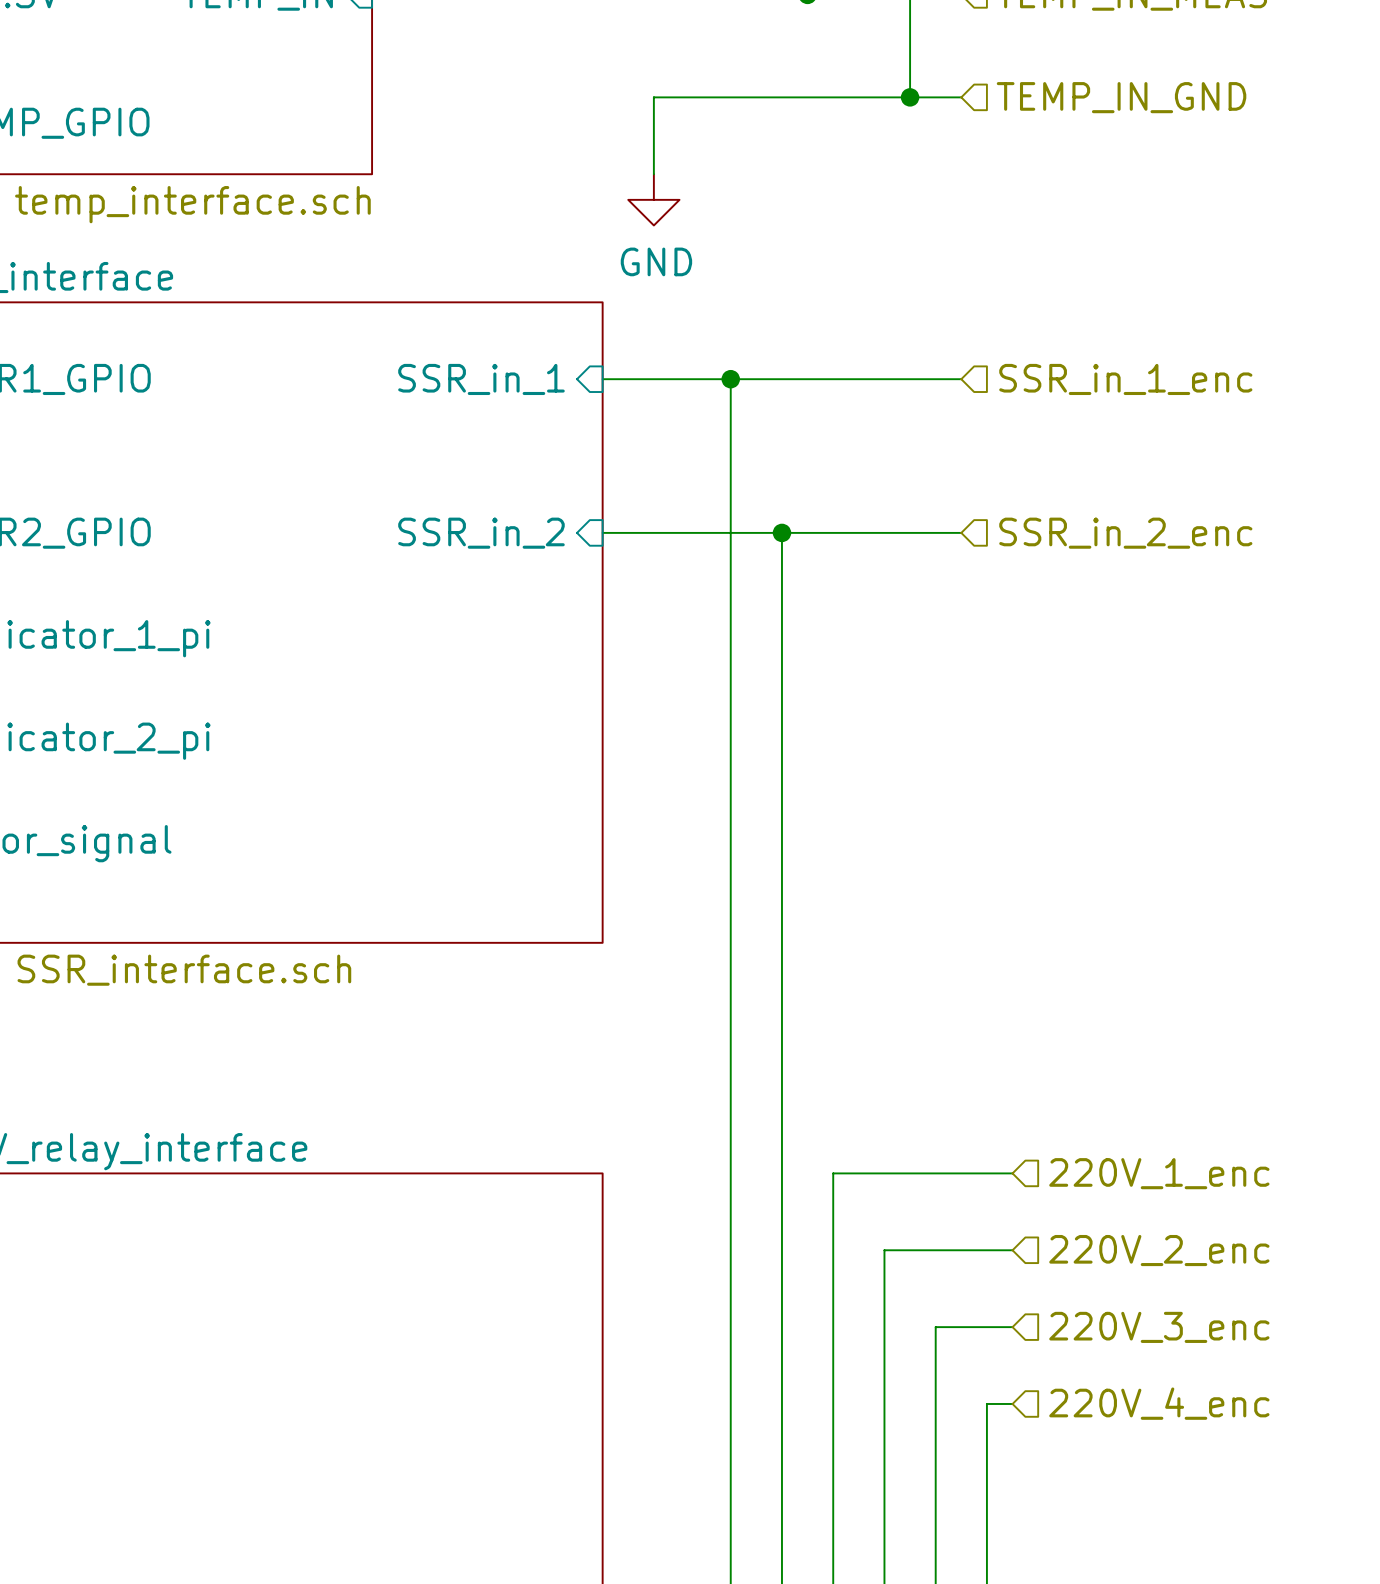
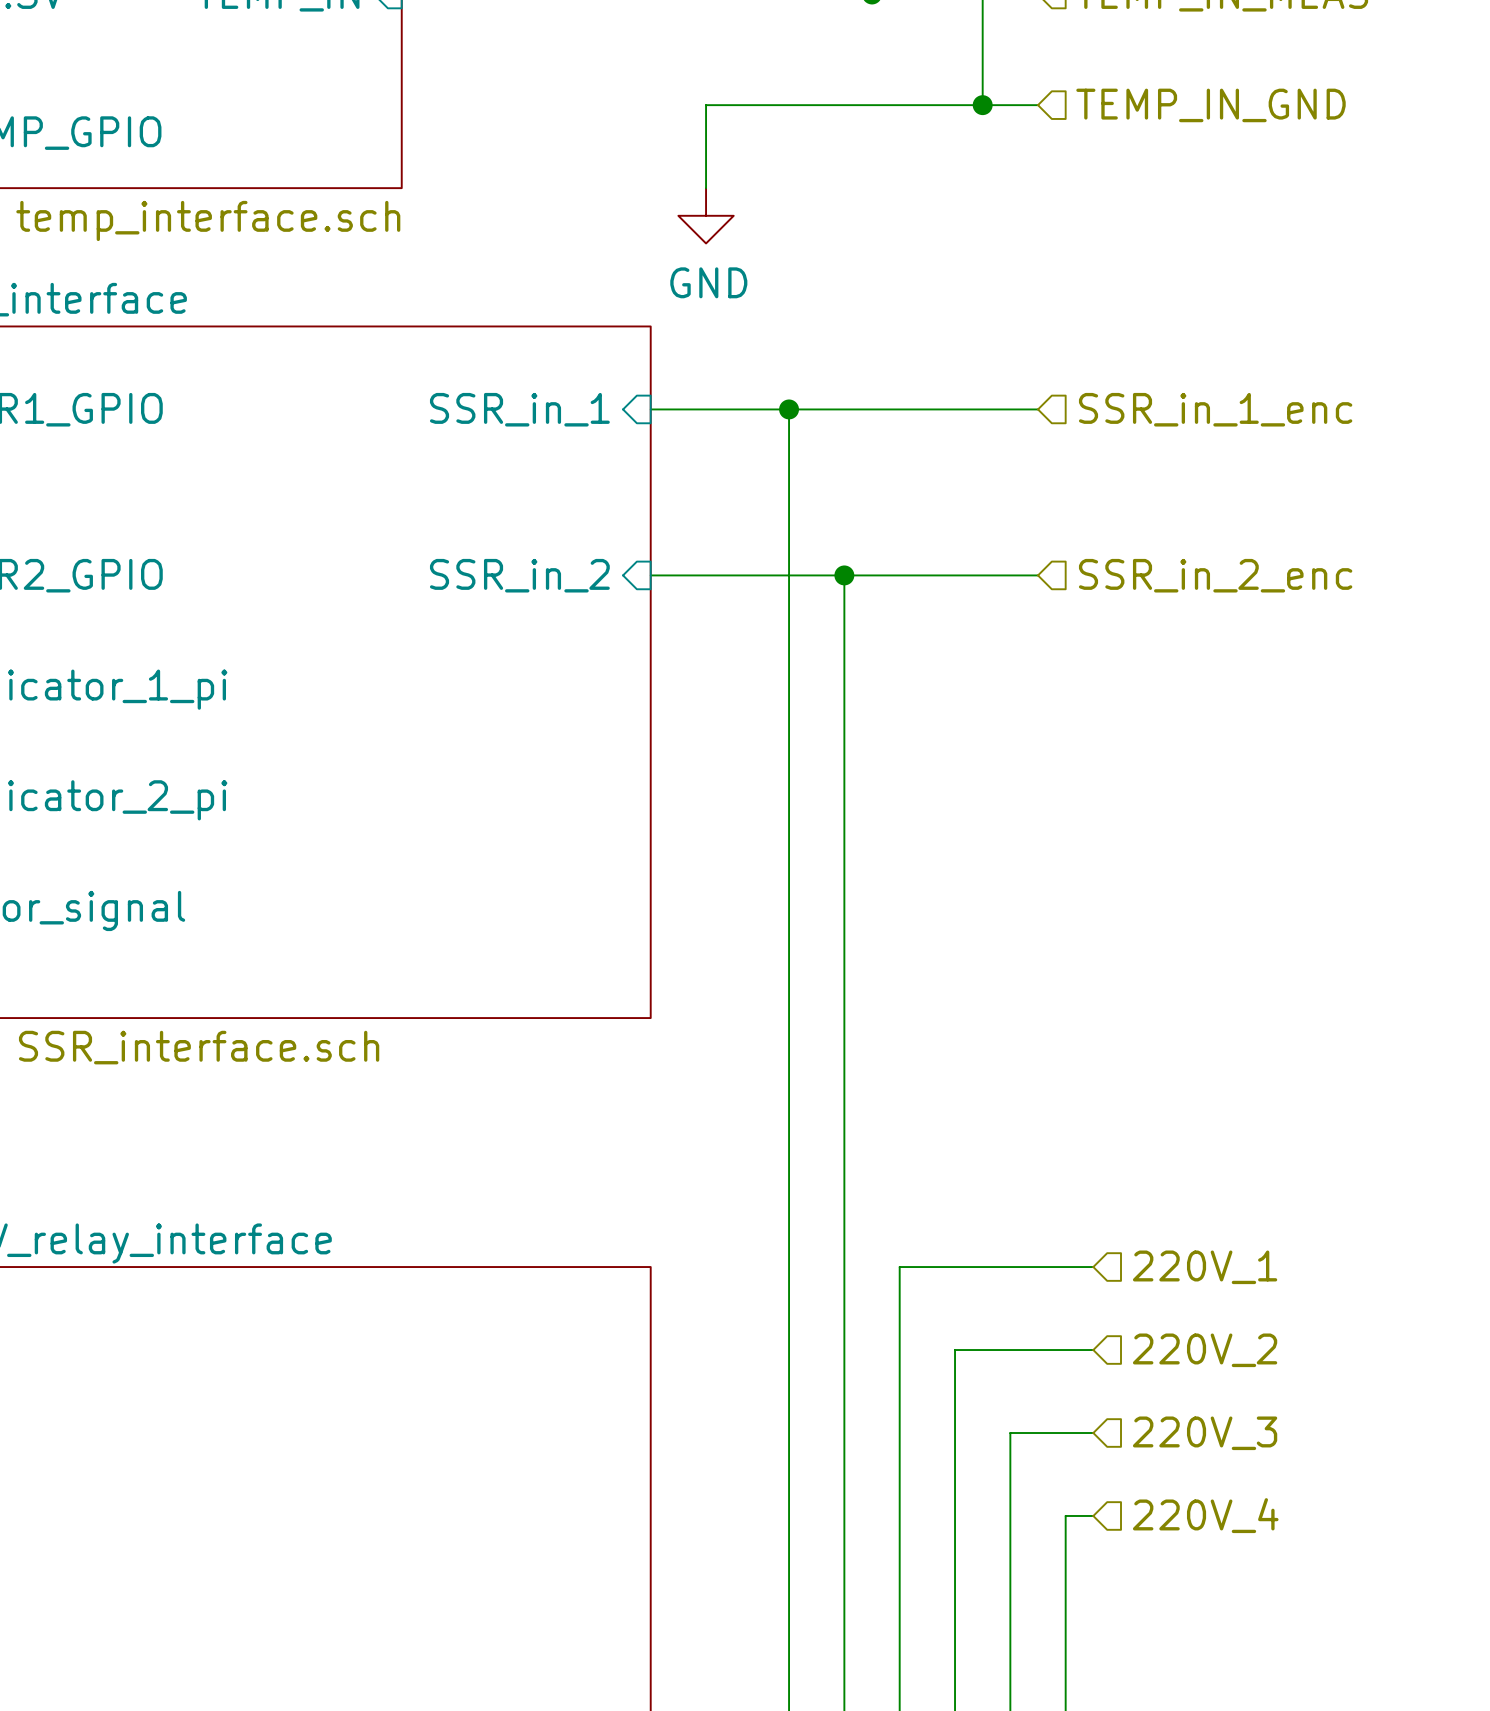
hierarchical label: 220V_1_enc (1159, 1173) -> 220V_1 (1205, 1267)
hierarchical label: 220V_2_enc (1159, 1250) -> 220V_2 (1205, 1350)
hierarchical label: 220V_3_enc (1159, 1327) -> 220V_3 (1205, 1433)
hierarchical label: 220V_4_enc (1159, 1403) -> 220V_4 (1205, 1515)

